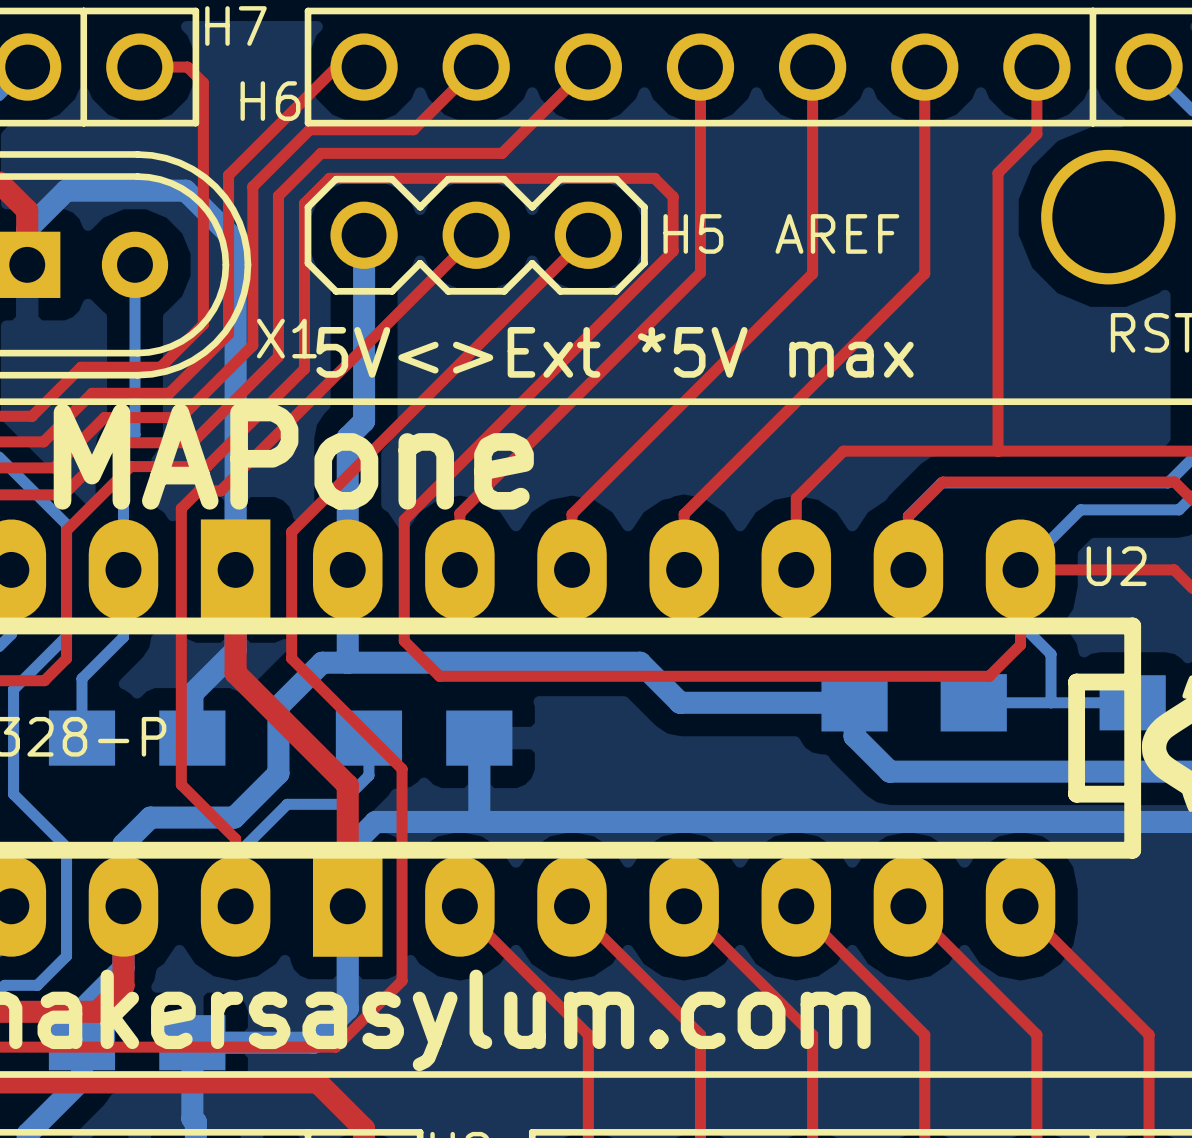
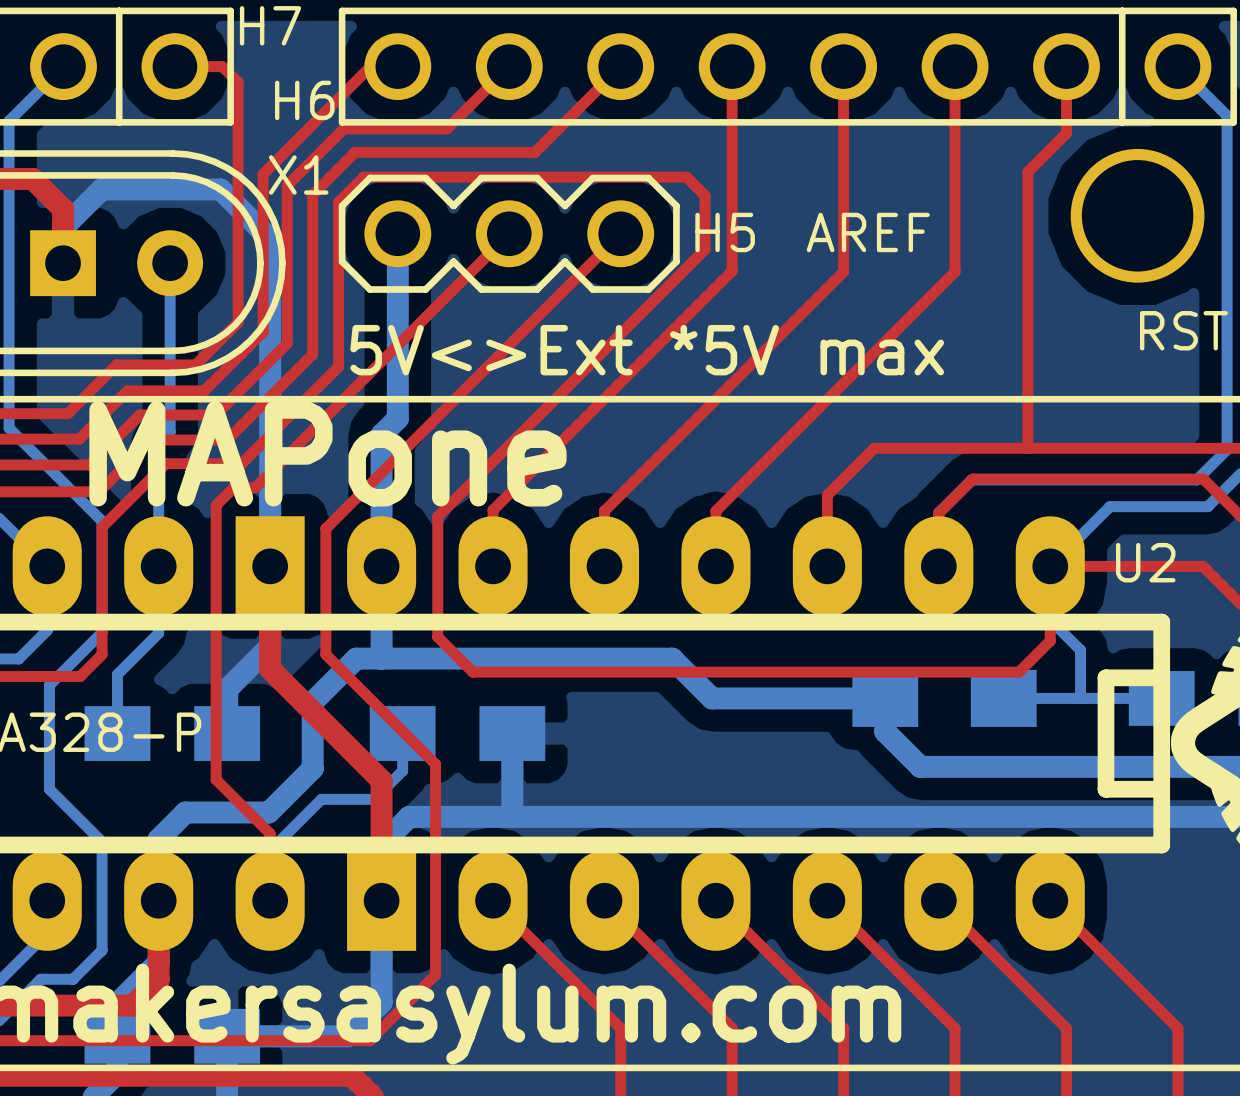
X1 name position: X1 (286, 338) -> X1 (298, 174)

